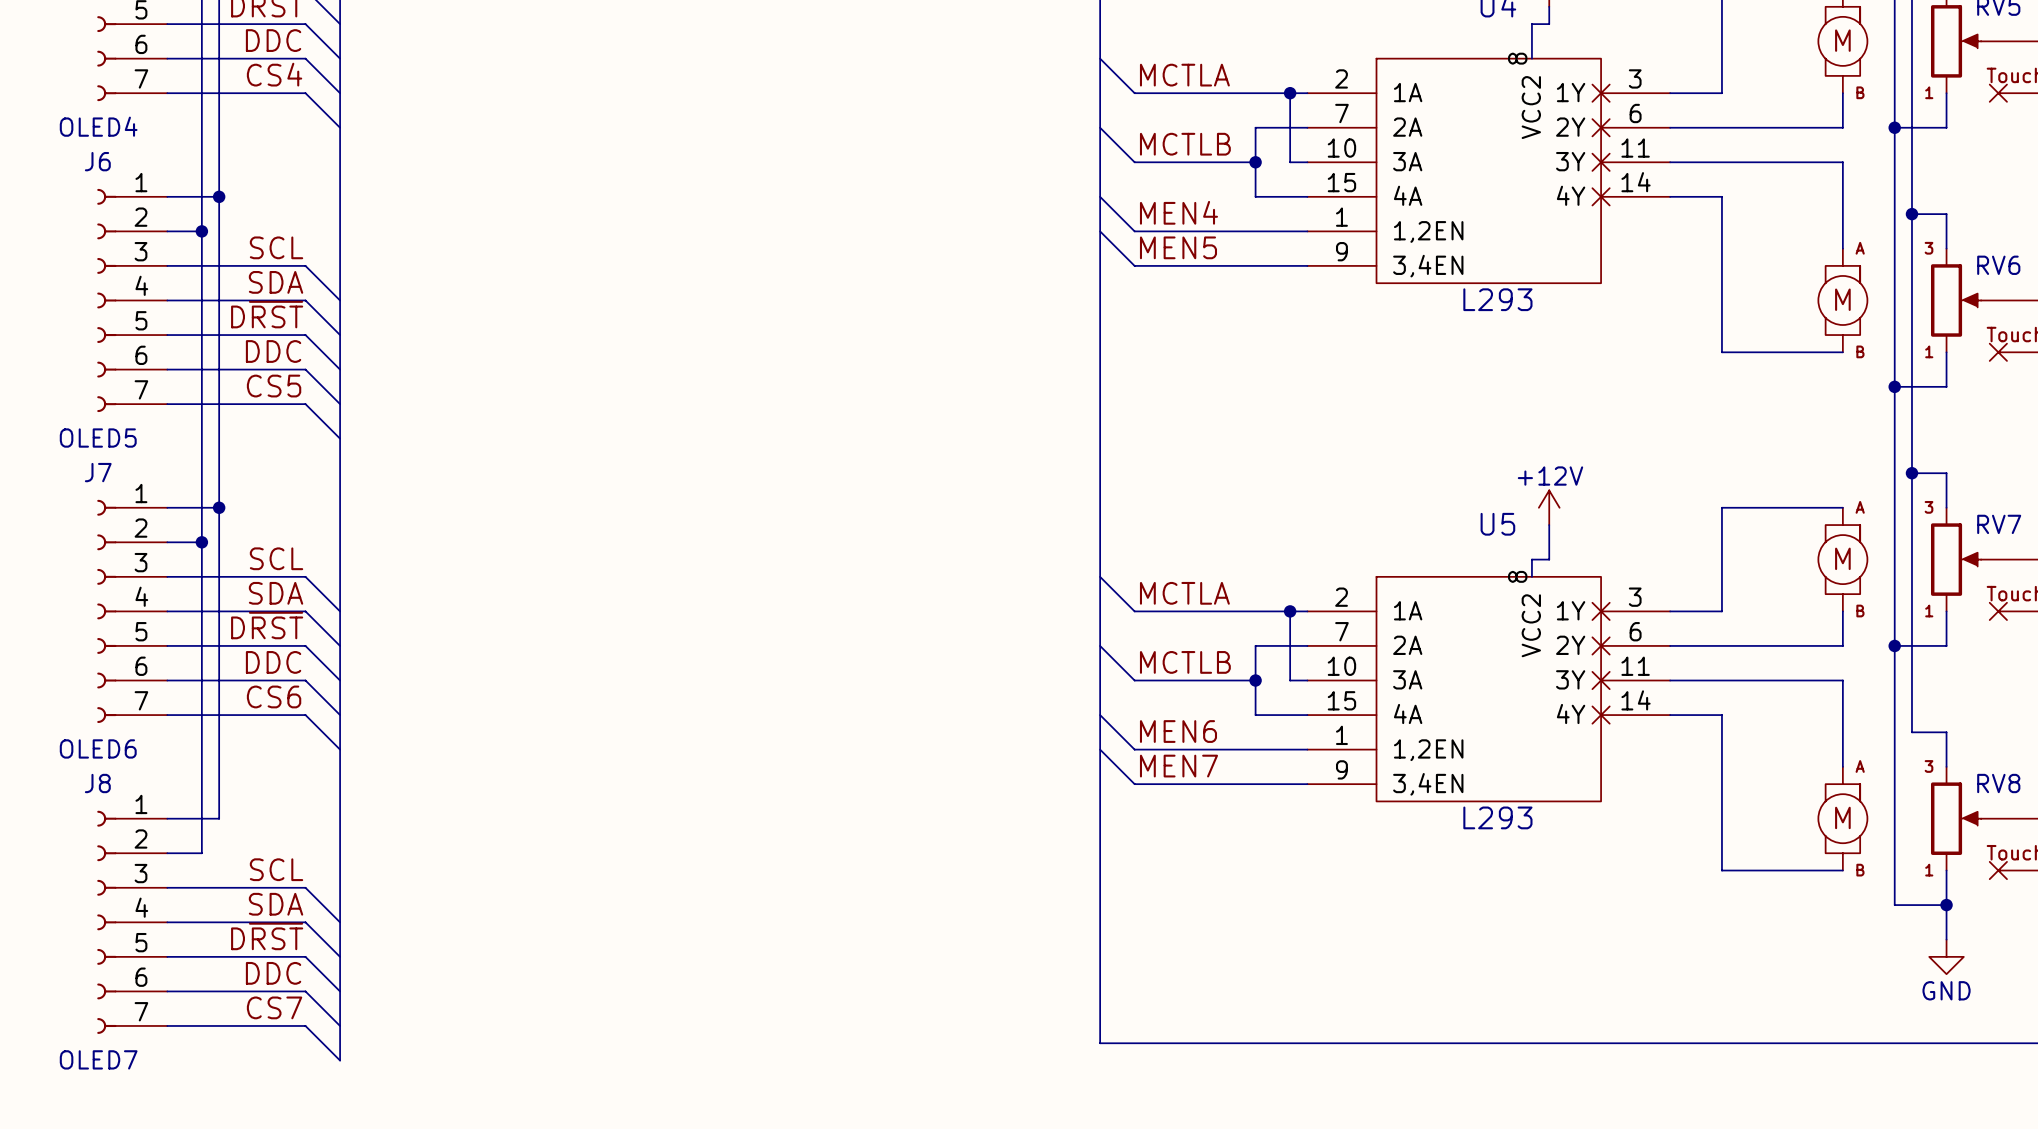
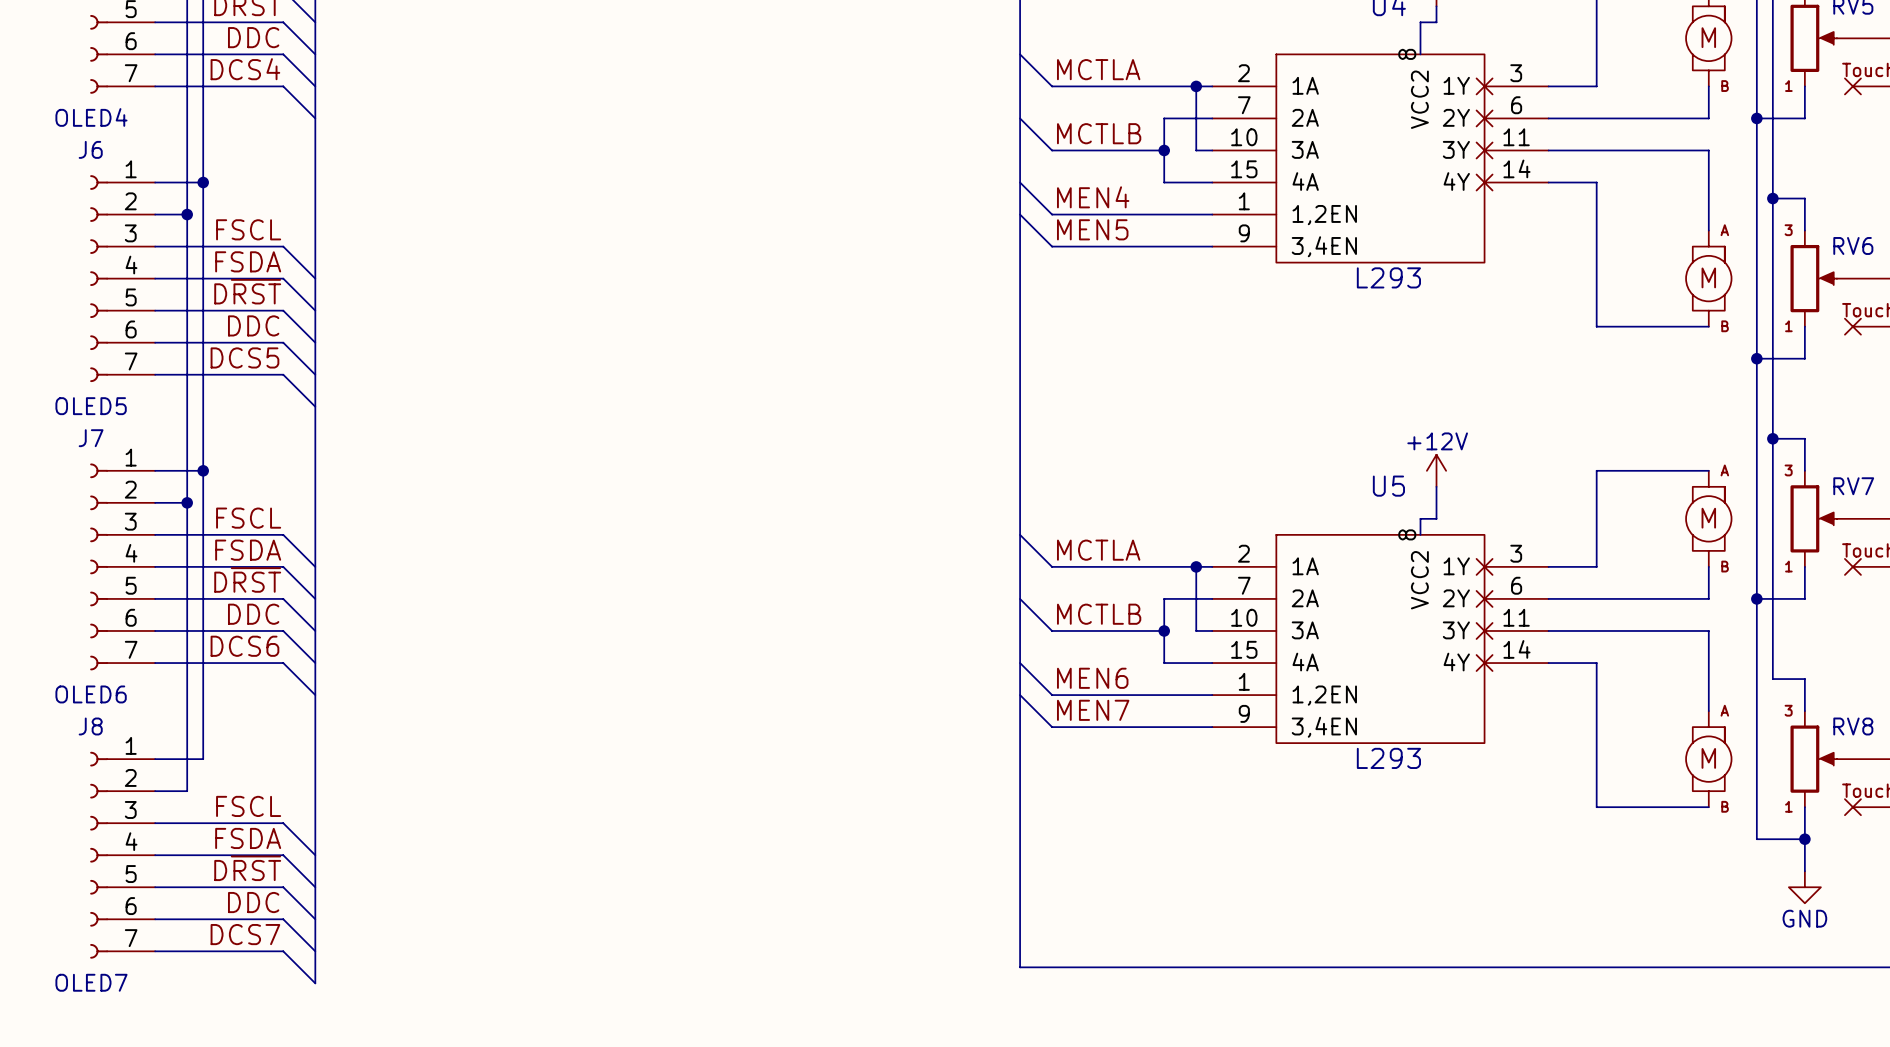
label: CS4 (274, 74) -> DCS4 (245, 69)
label: SCL (276, 247) -> FSCL (248, 229)
label: SDA (276, 282) -> FSDA (248, 261)
label: CS5 (274, 386) -> DCS5 (244, 357)
label: SCL (276, 558) -> FSCL (248, 518)
label: SDA (276, 593) -> FSDA (248, 550)
label: CS6 (274, 696) -> DCS6 (244, 646)
label: SCL (276, 869) -> FSCL (248, 806)
label: SDA (276, 904) -> FSDA (248, 838)
label: CS7 (274, 1007) -> DCS7 (245, 934)

